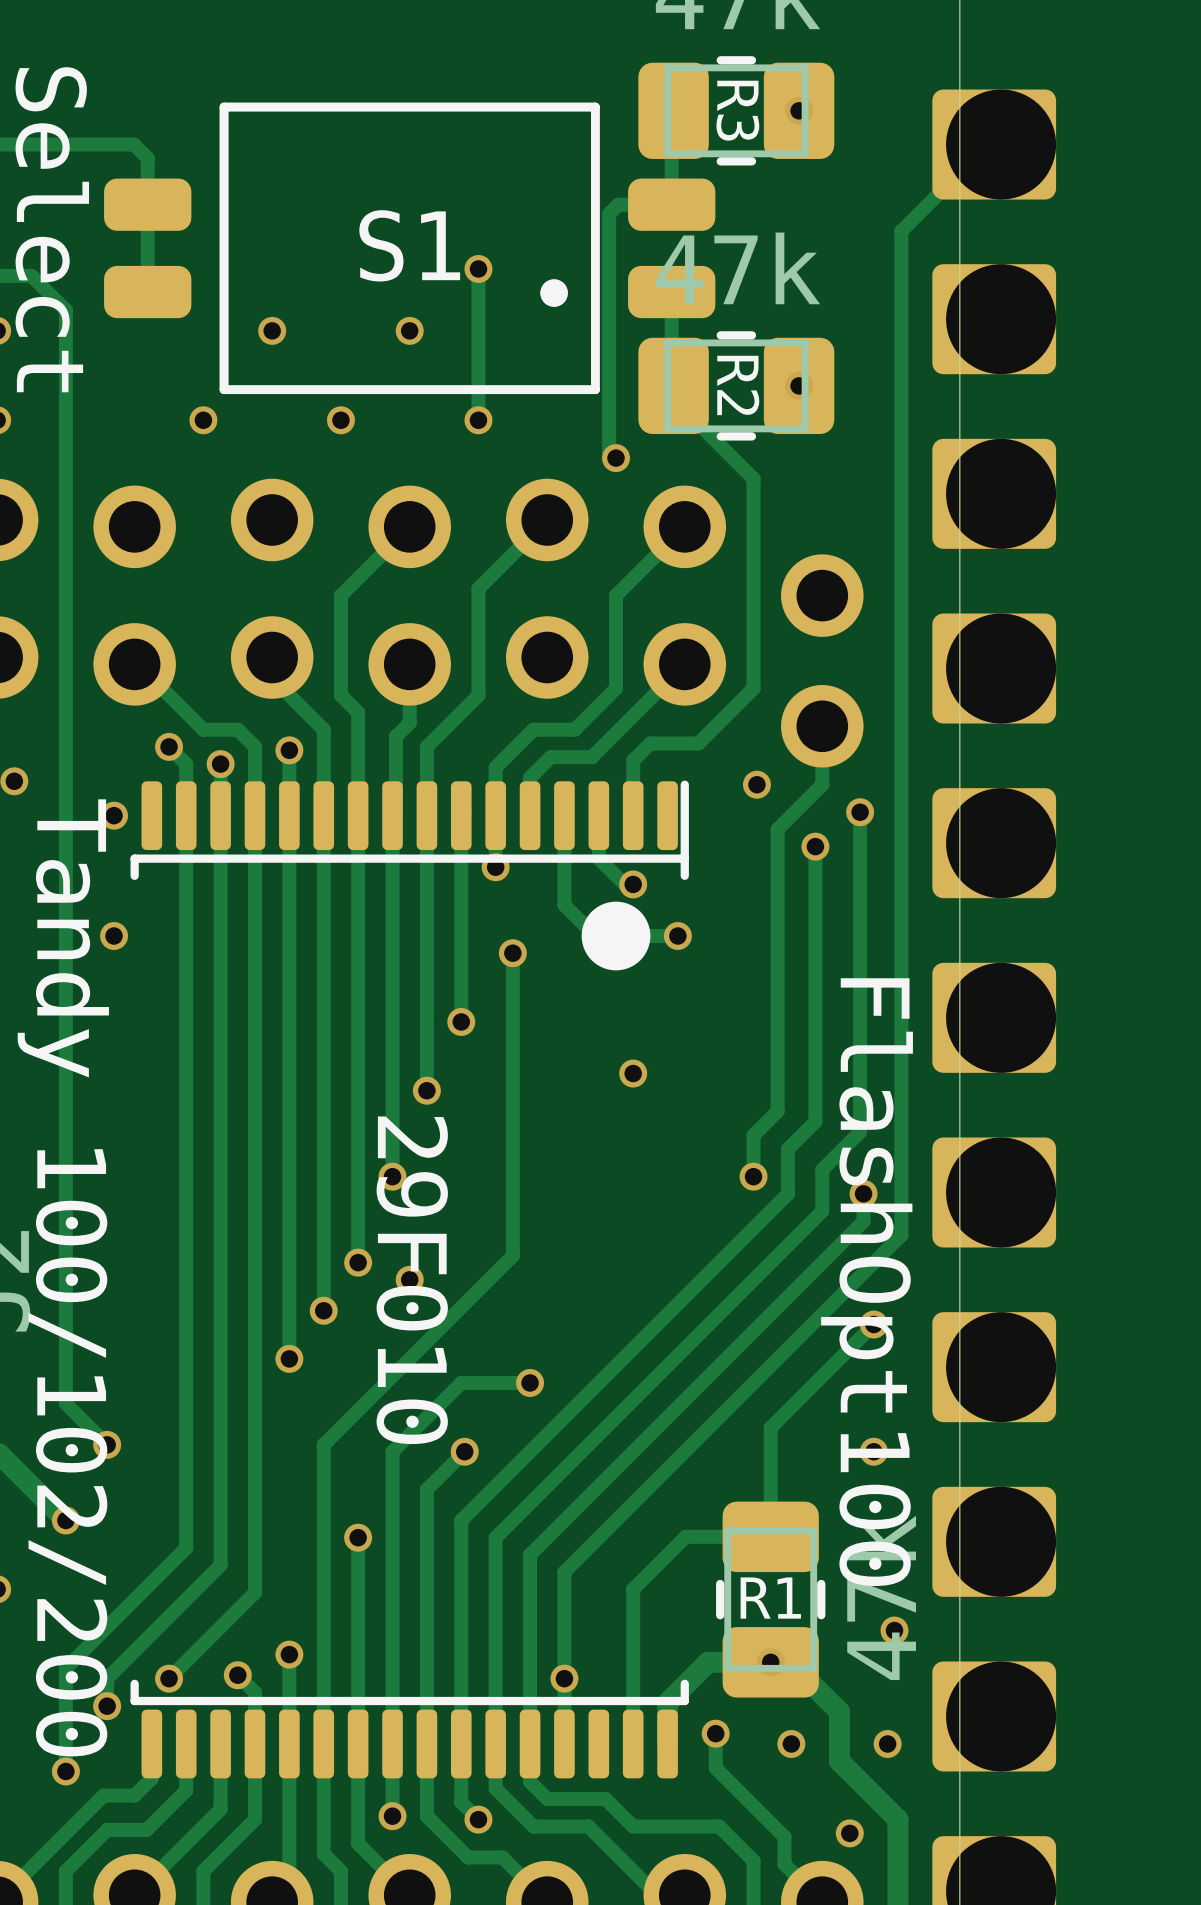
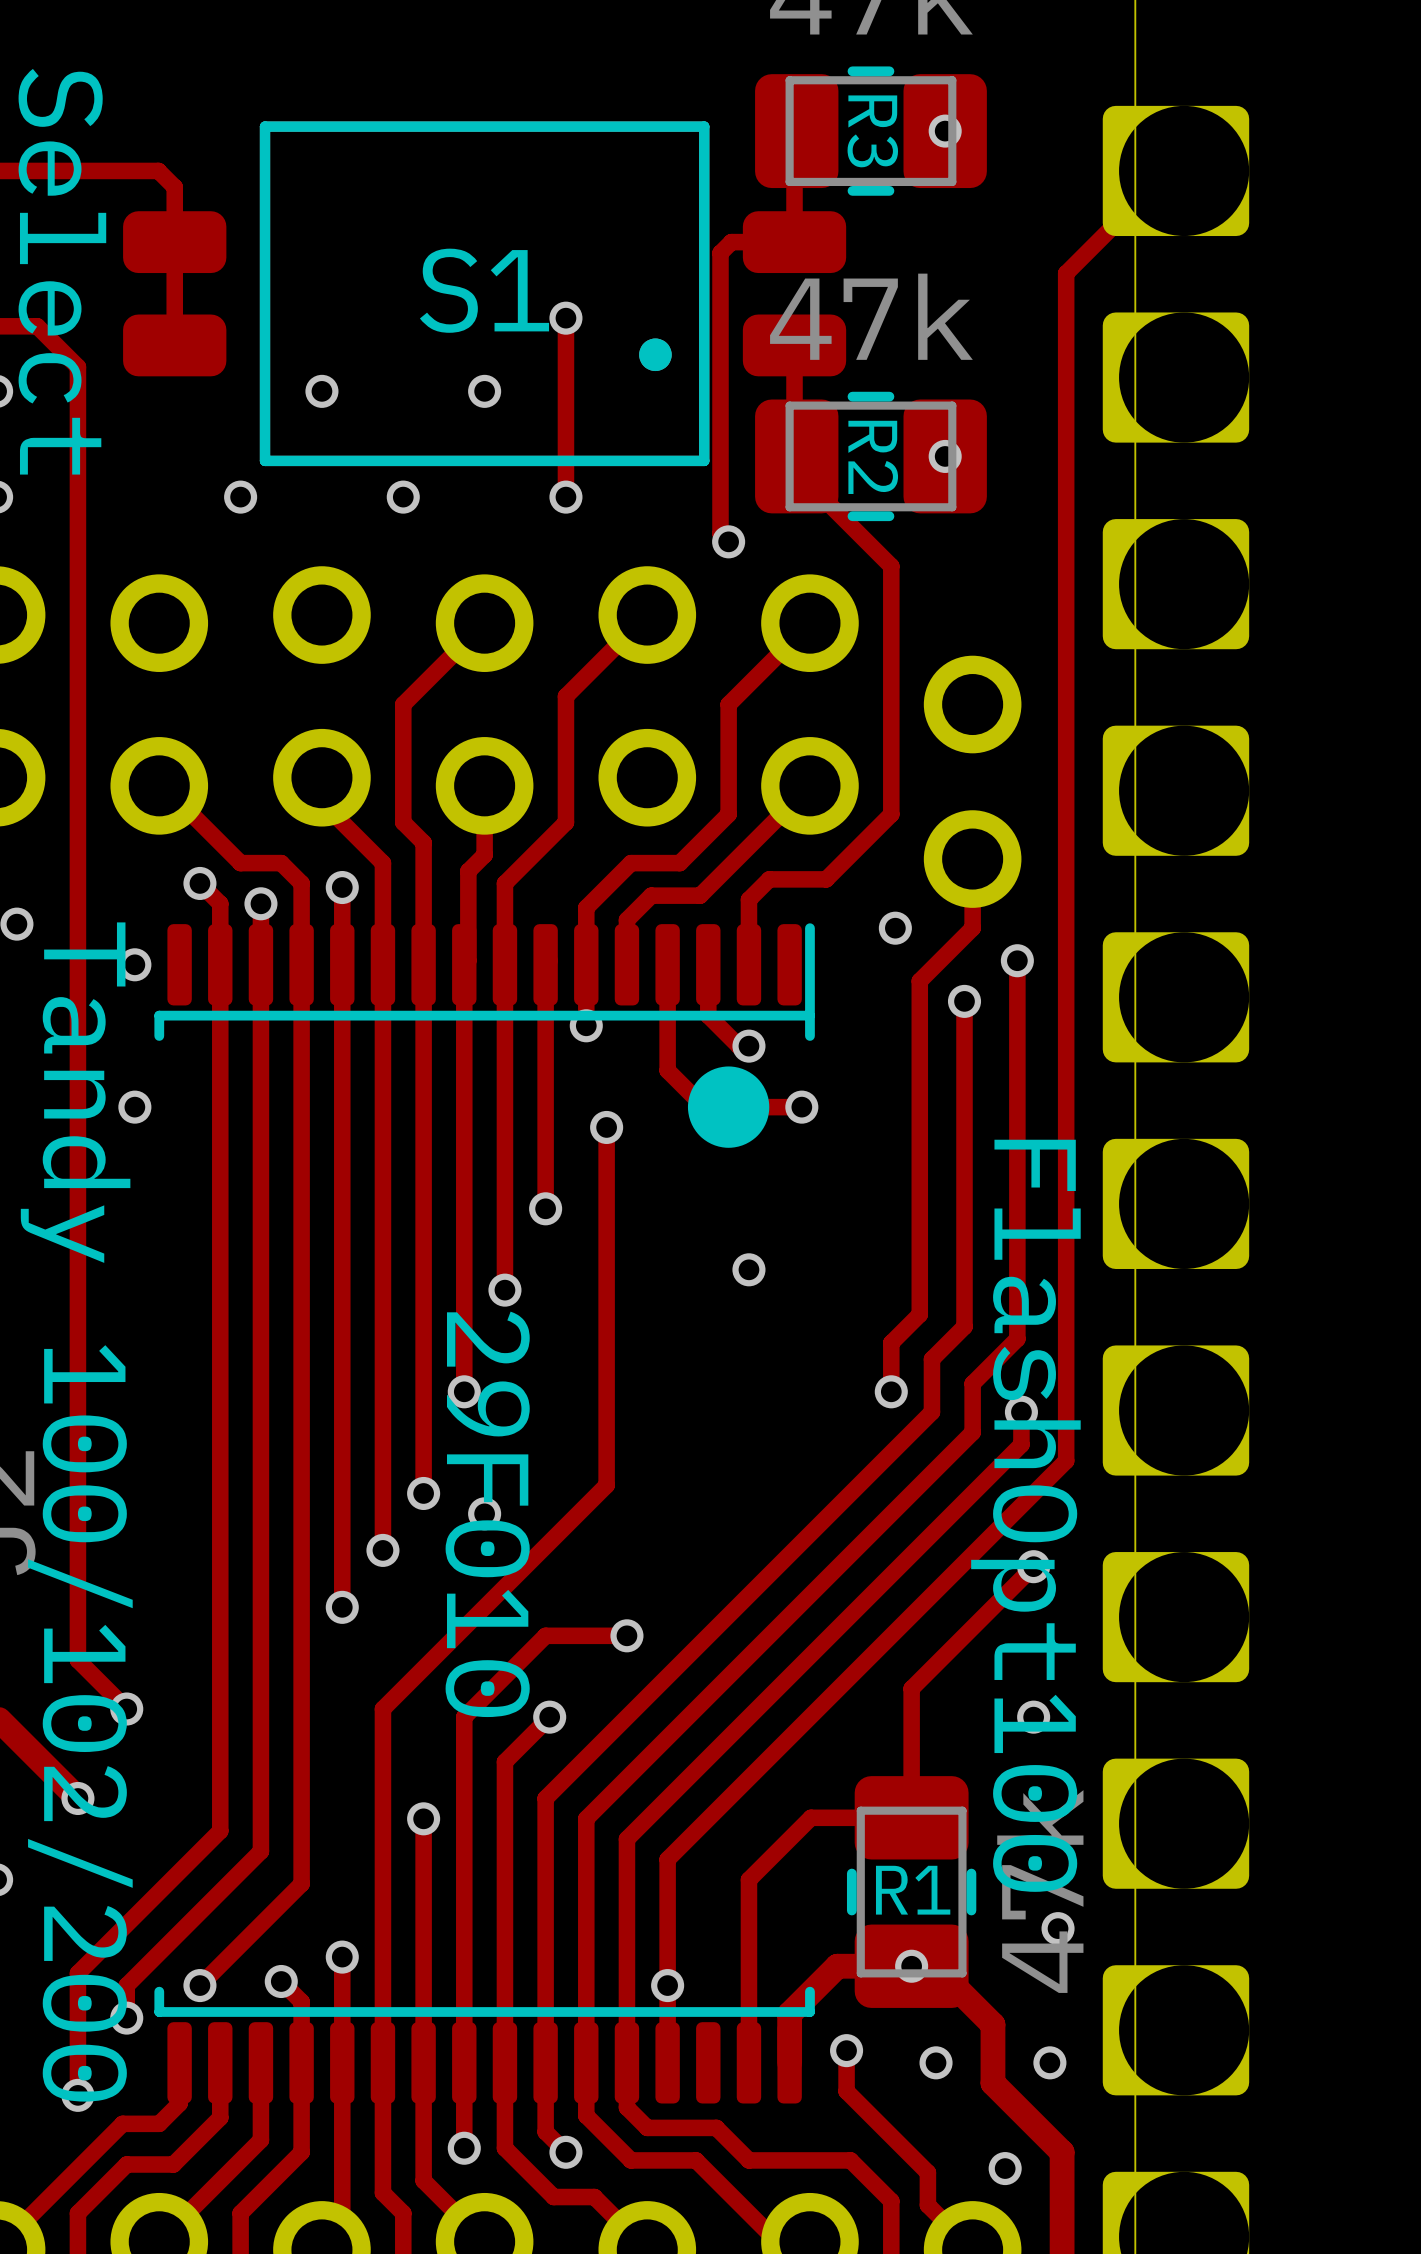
S1 footprint: [104, 102, 716, 395] -> [123, 121, 847, 467]

